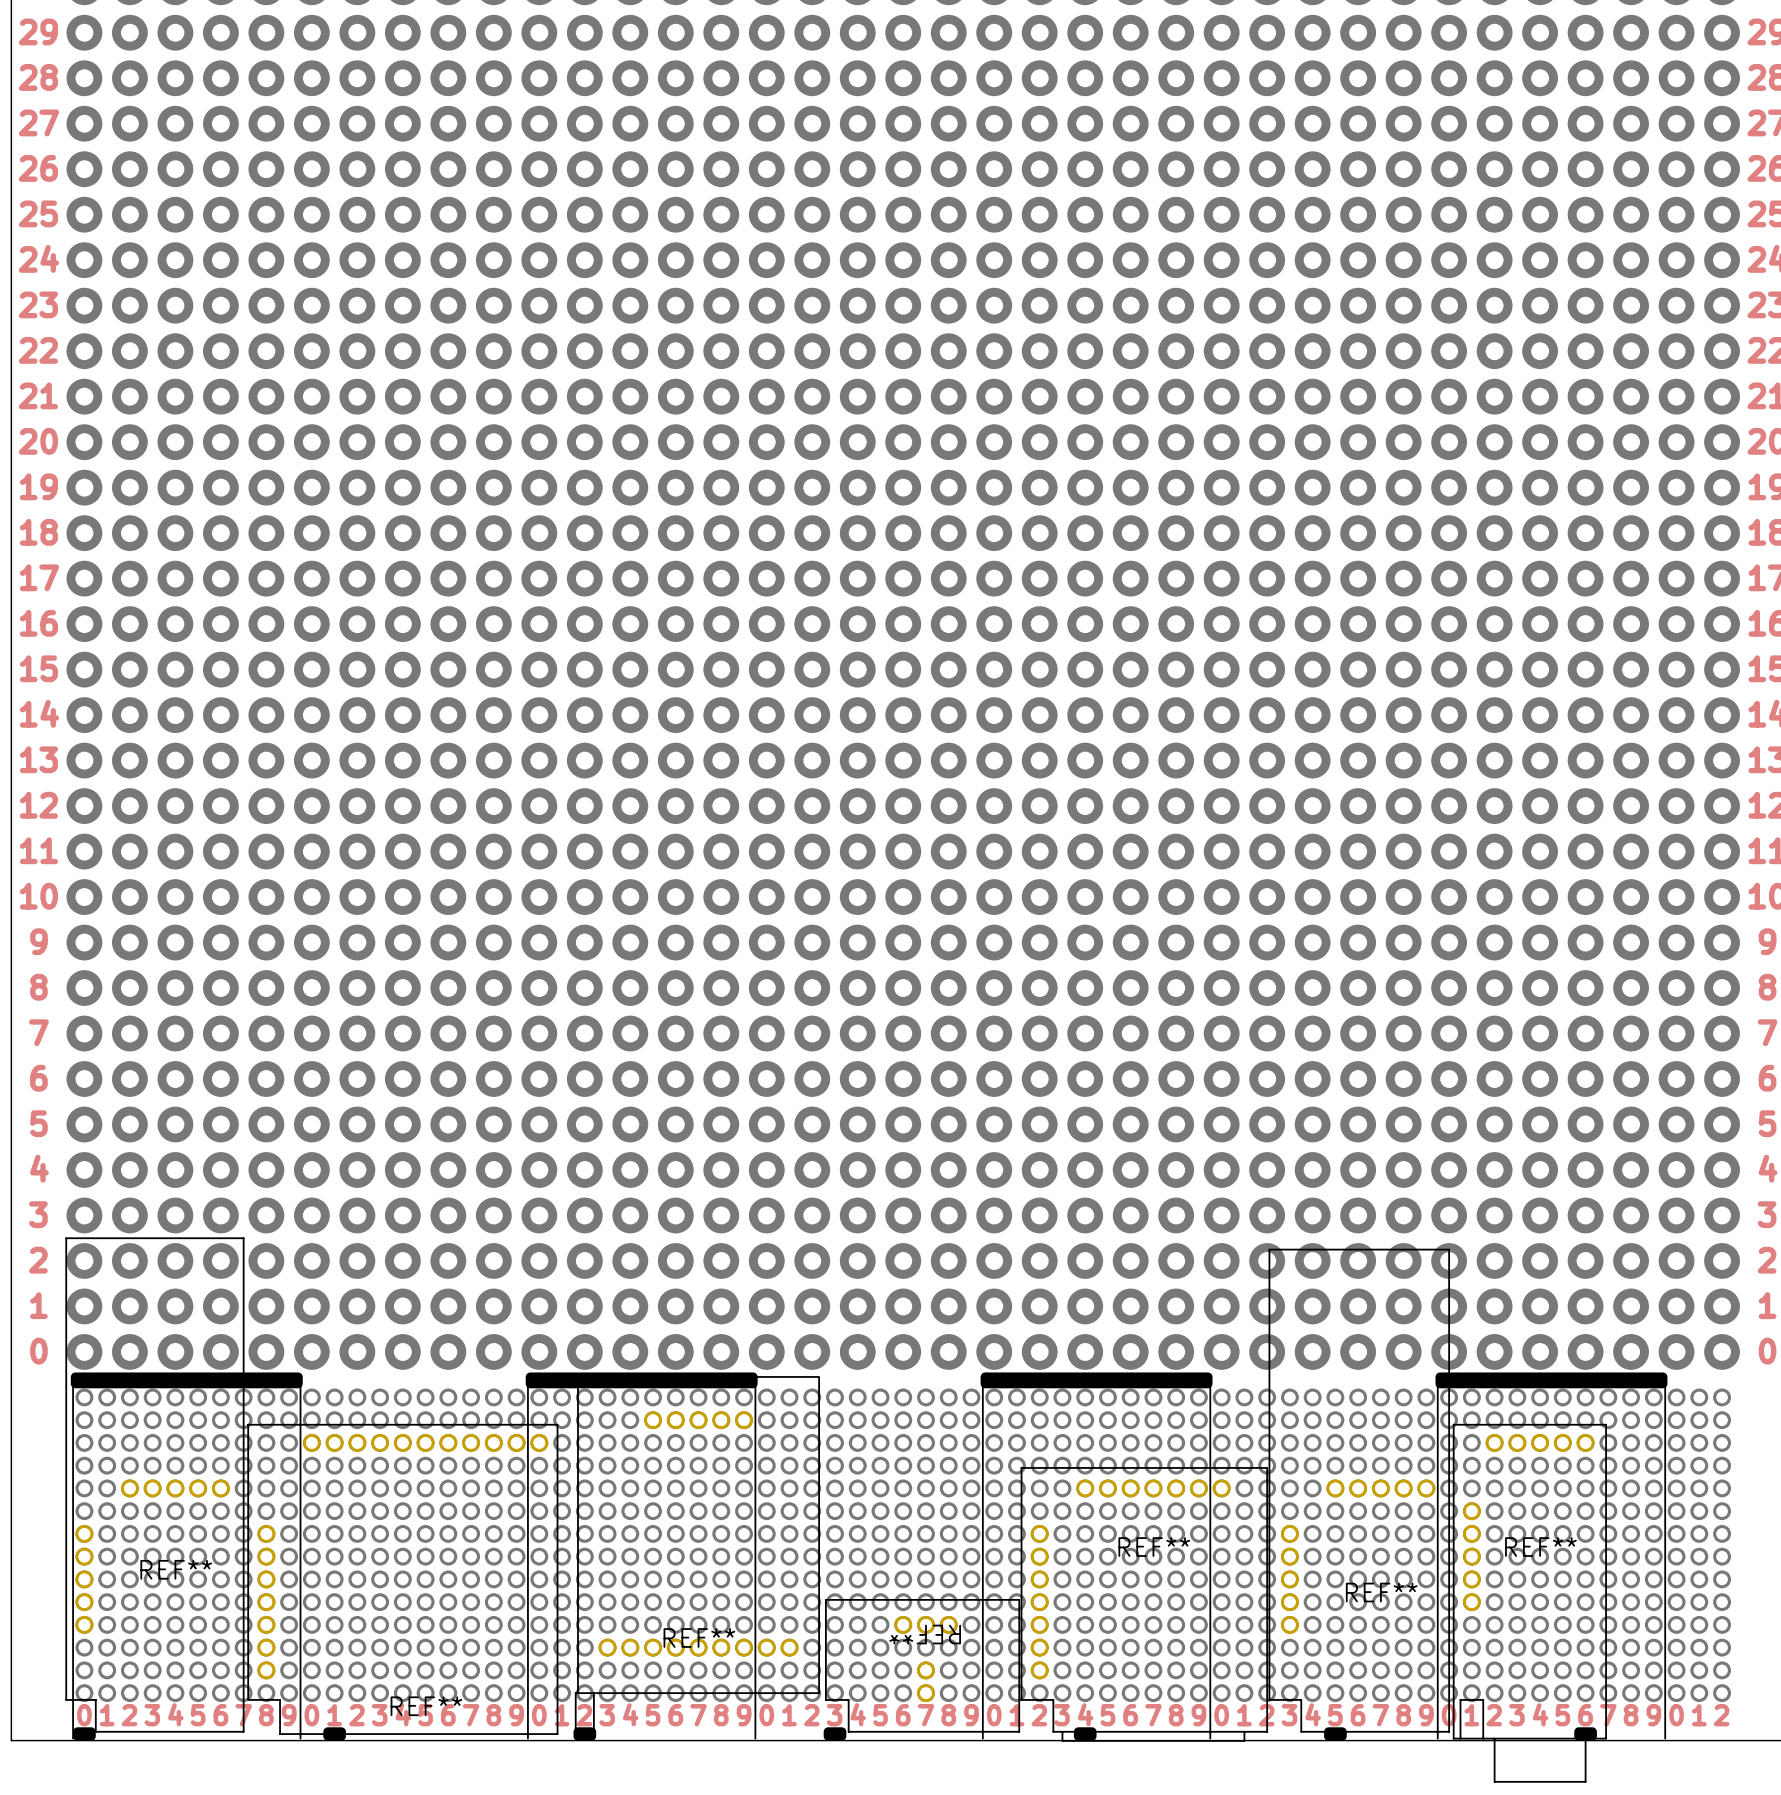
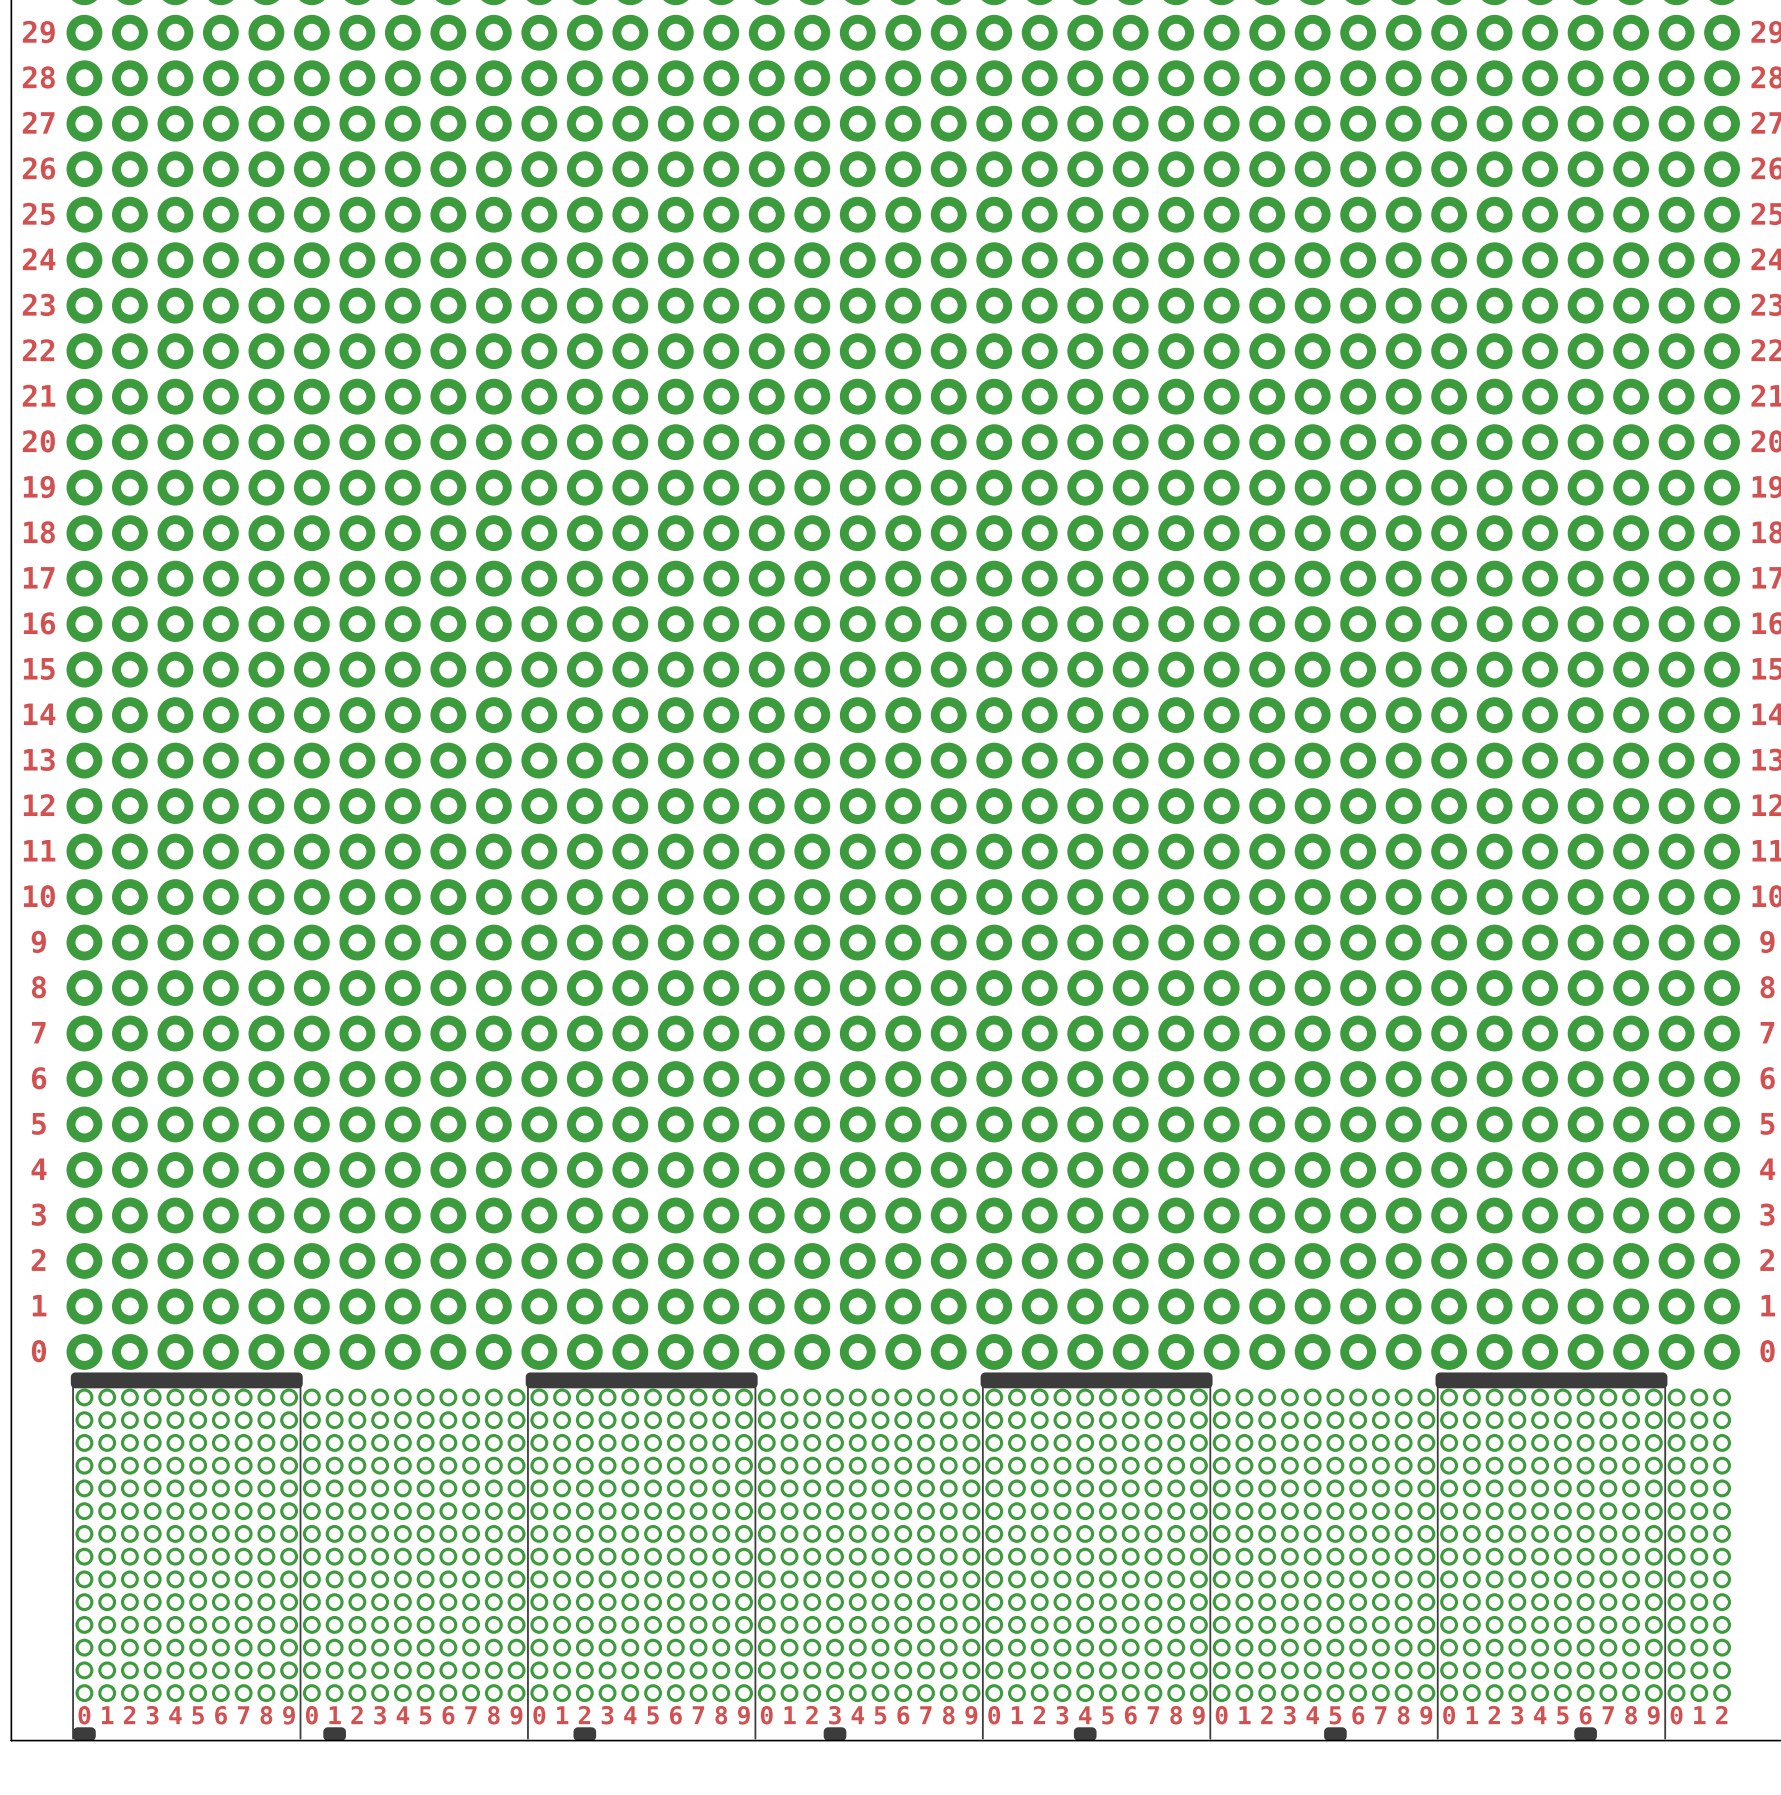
REF**: (154, 1485) -> none
REF**: (1359, 1490) -> none
REF**: (697, 1554) -> none
REF**: (402, 1579) -> none
REF**: (1529, 1603) -> none
REF**: (1144, 1604) -> none
REF**: (922, 1665) -> none

